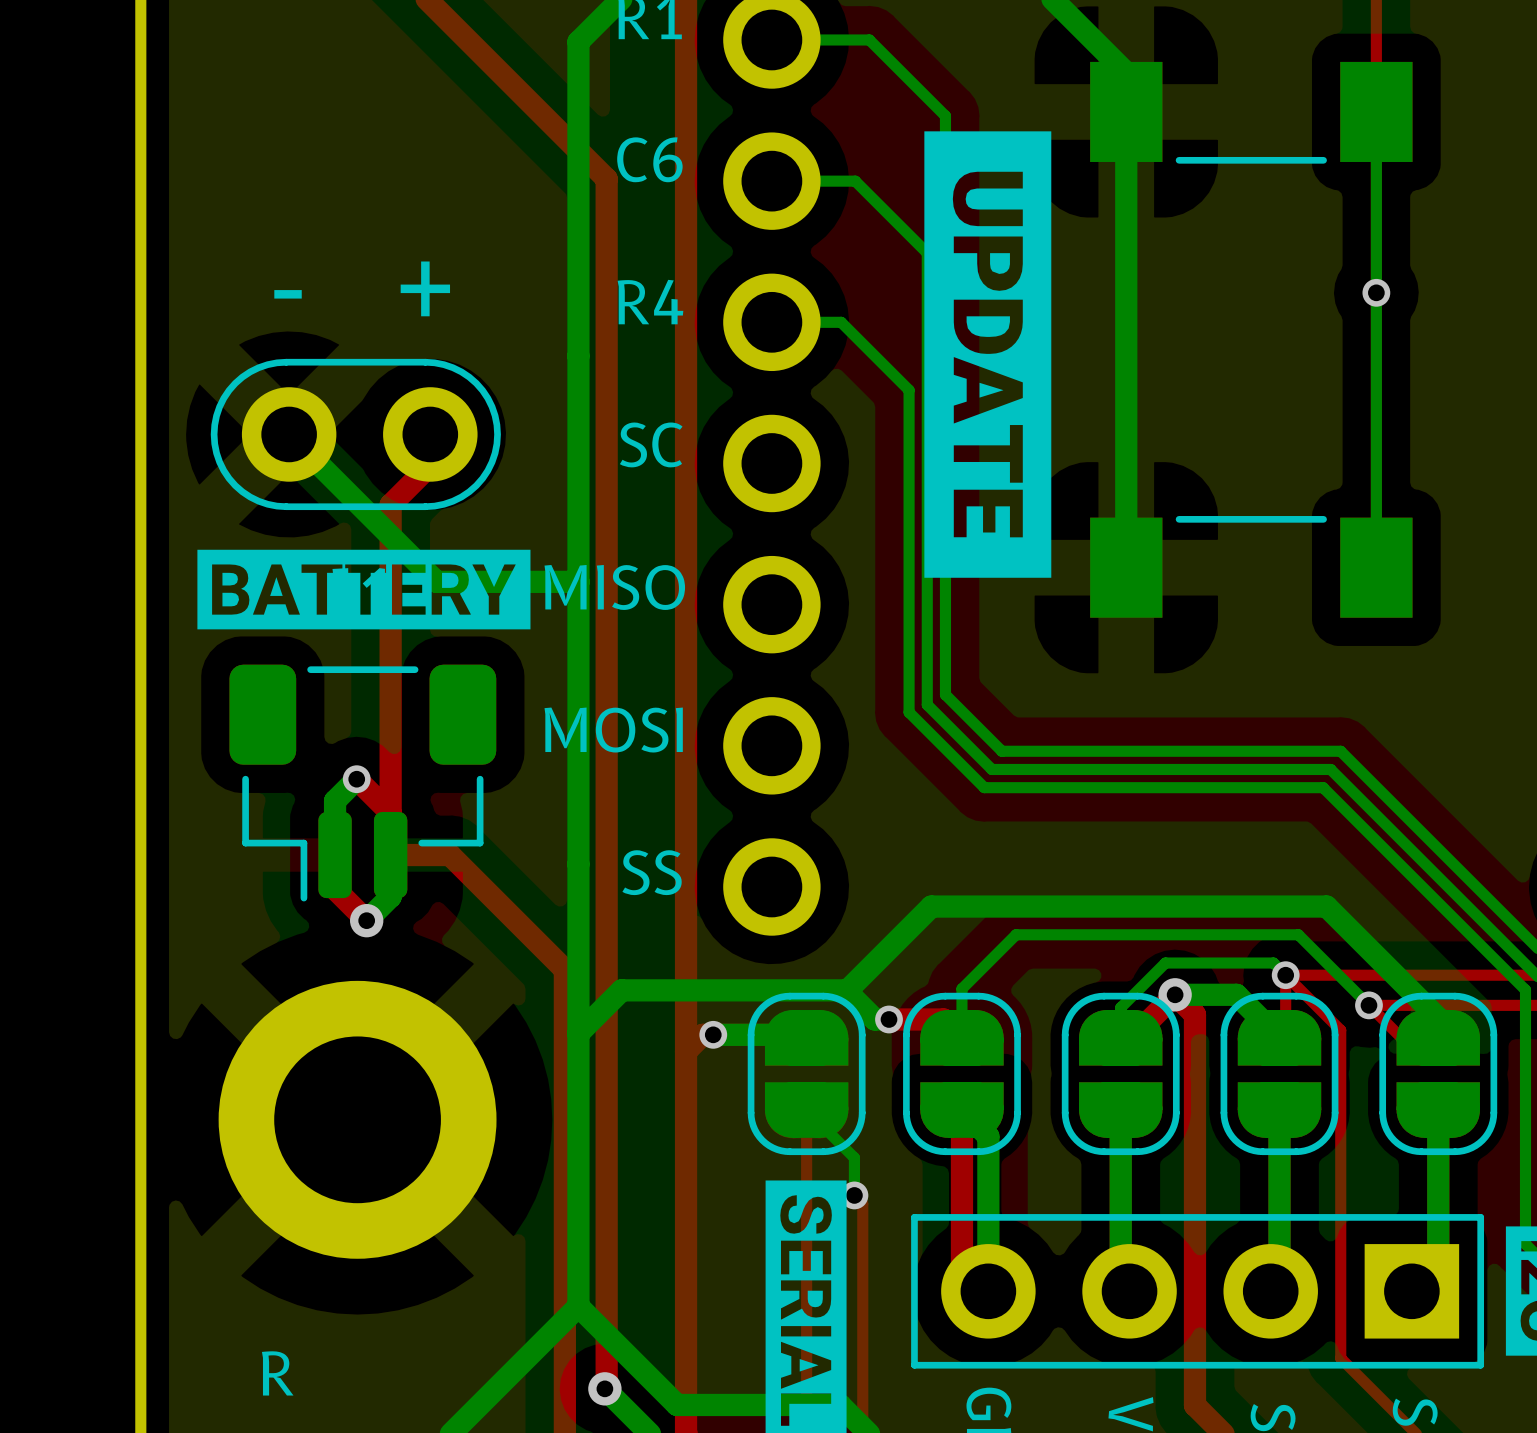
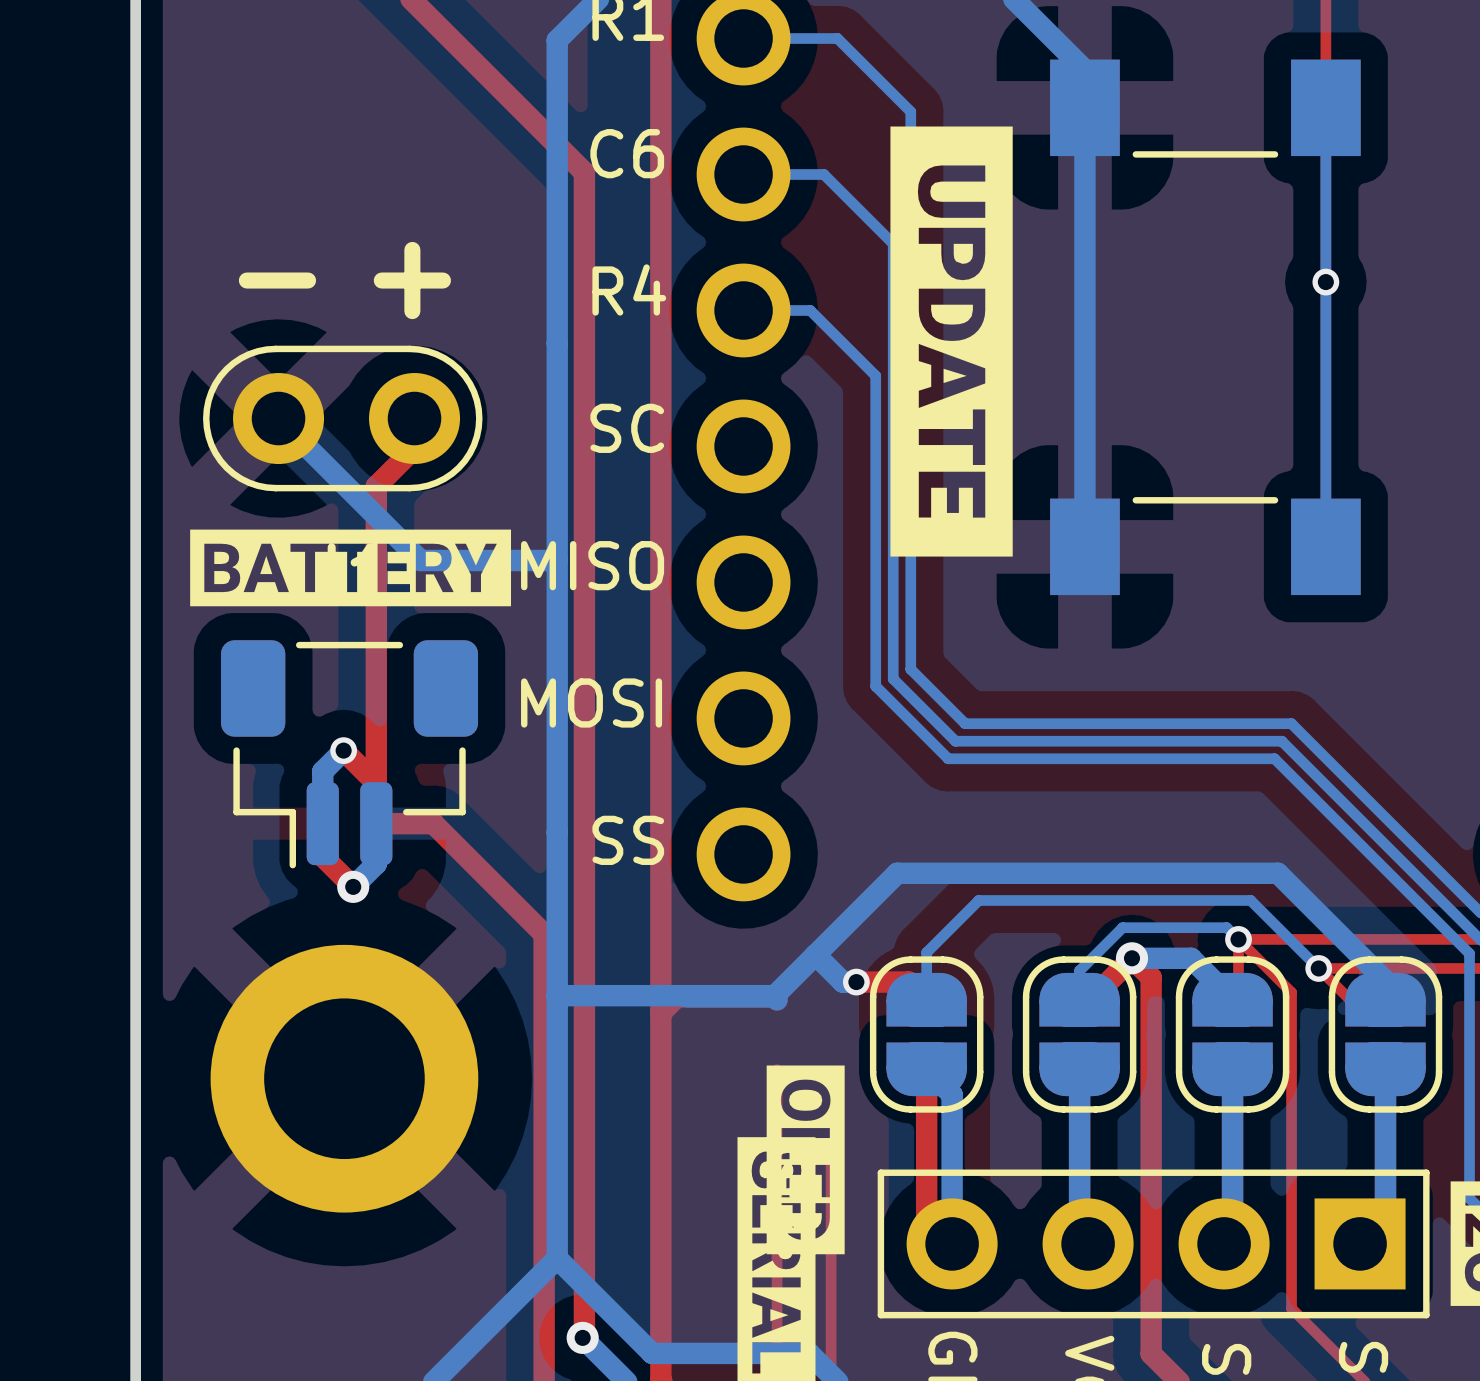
bottom track: (846, 991) (621, 990) (578, 1033) -> (815, 954) (774, 995) (557, 995)
via: (713, 1034) -> none
part: (806, 1073) -> none
drawing: none -> [766, 1065, 845, 1255]
bottom track: (806, 1110) (854, 1157) (854, 1195) -> none
via: (854, 1195) -> none
text: R (277, 1373) -> none

